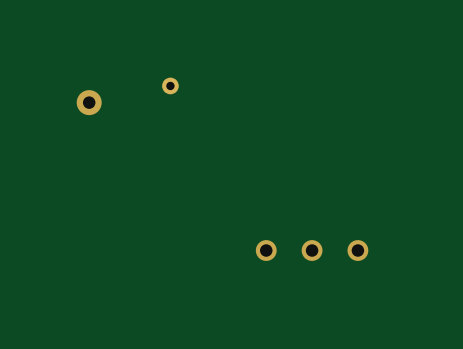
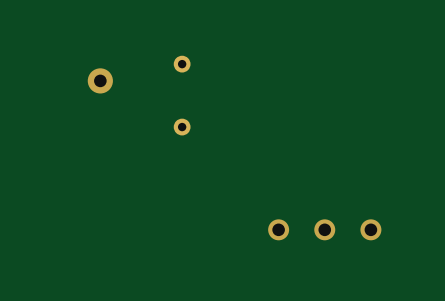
part footprint: [162, 77, 179, 95] -> [173, 55, 191, 136]

